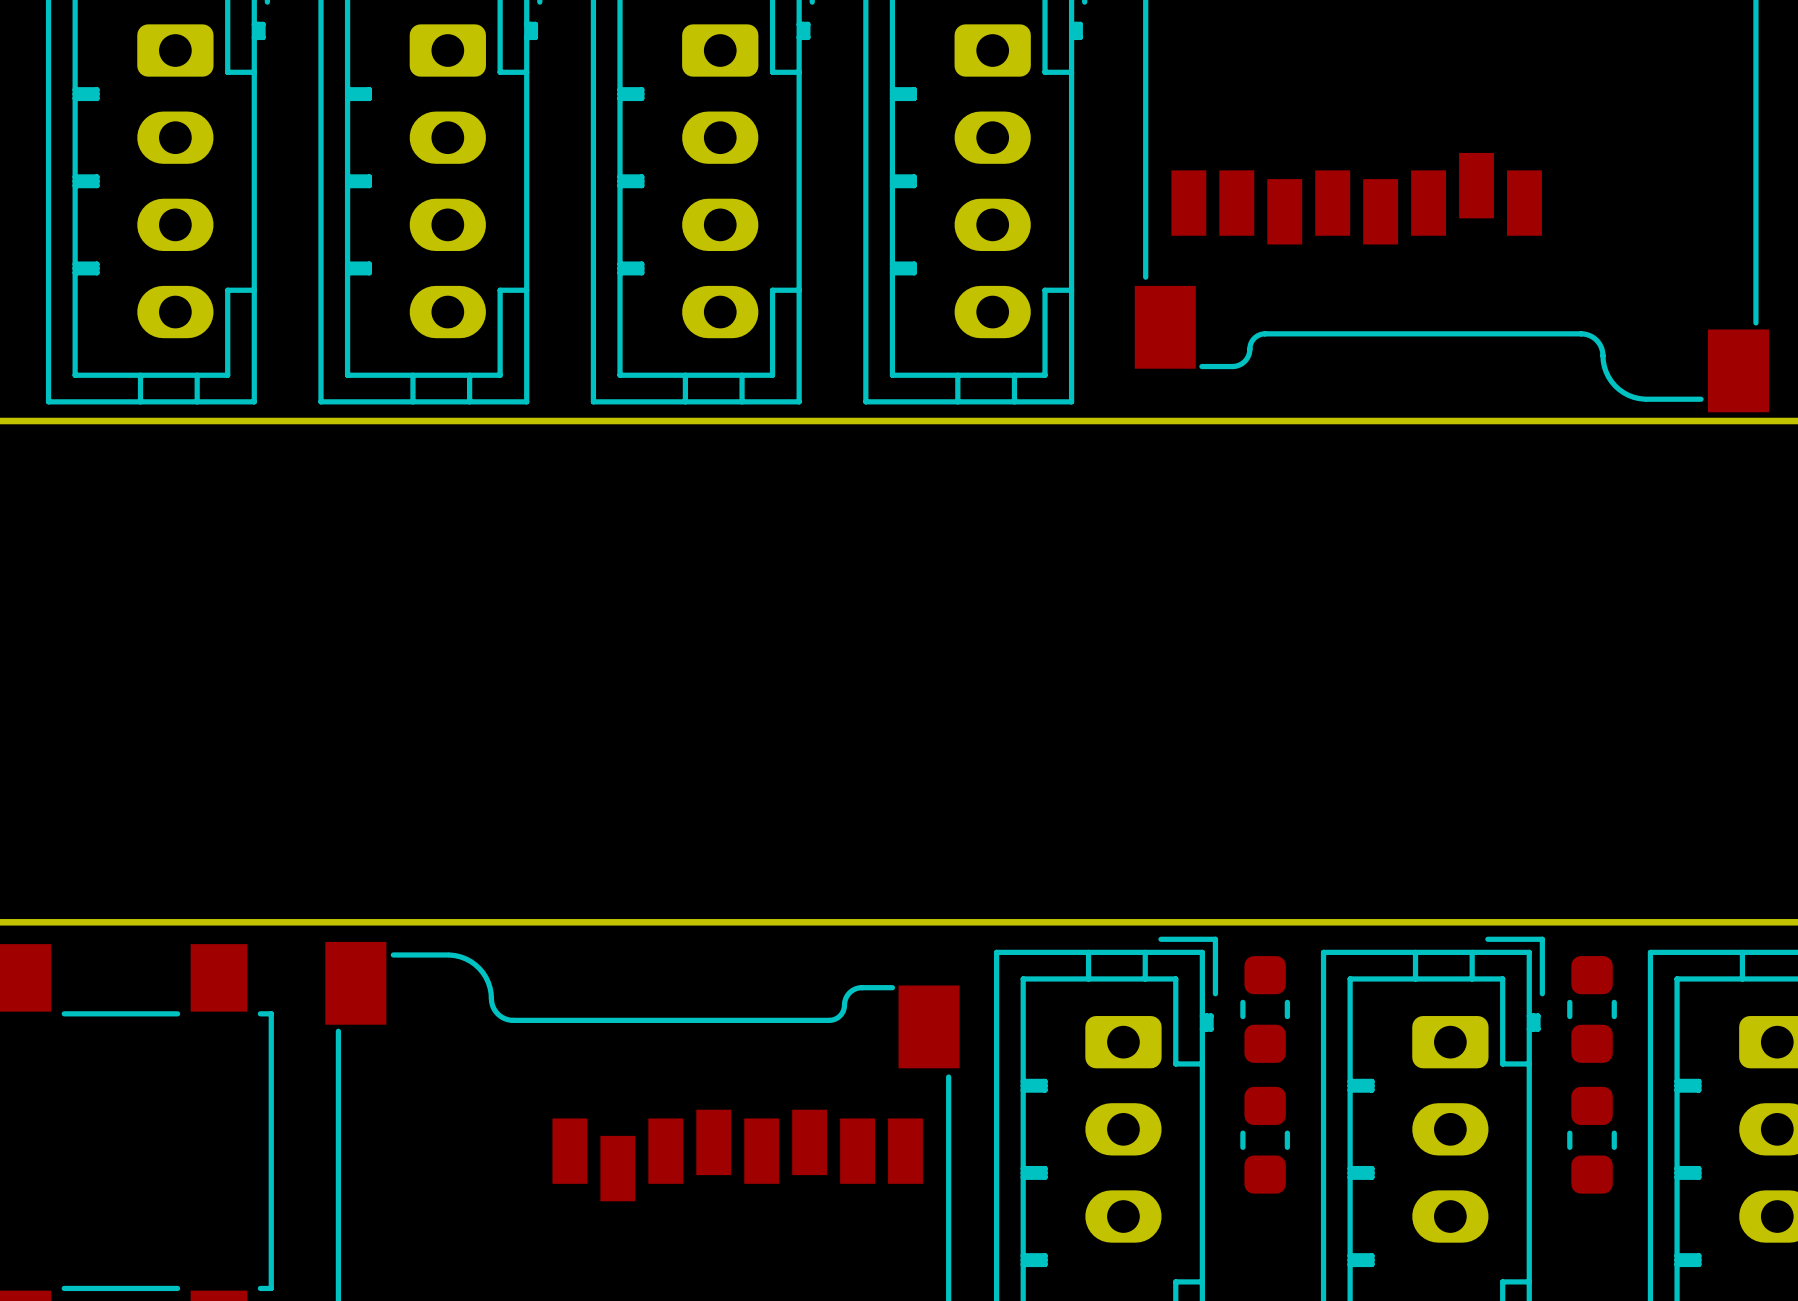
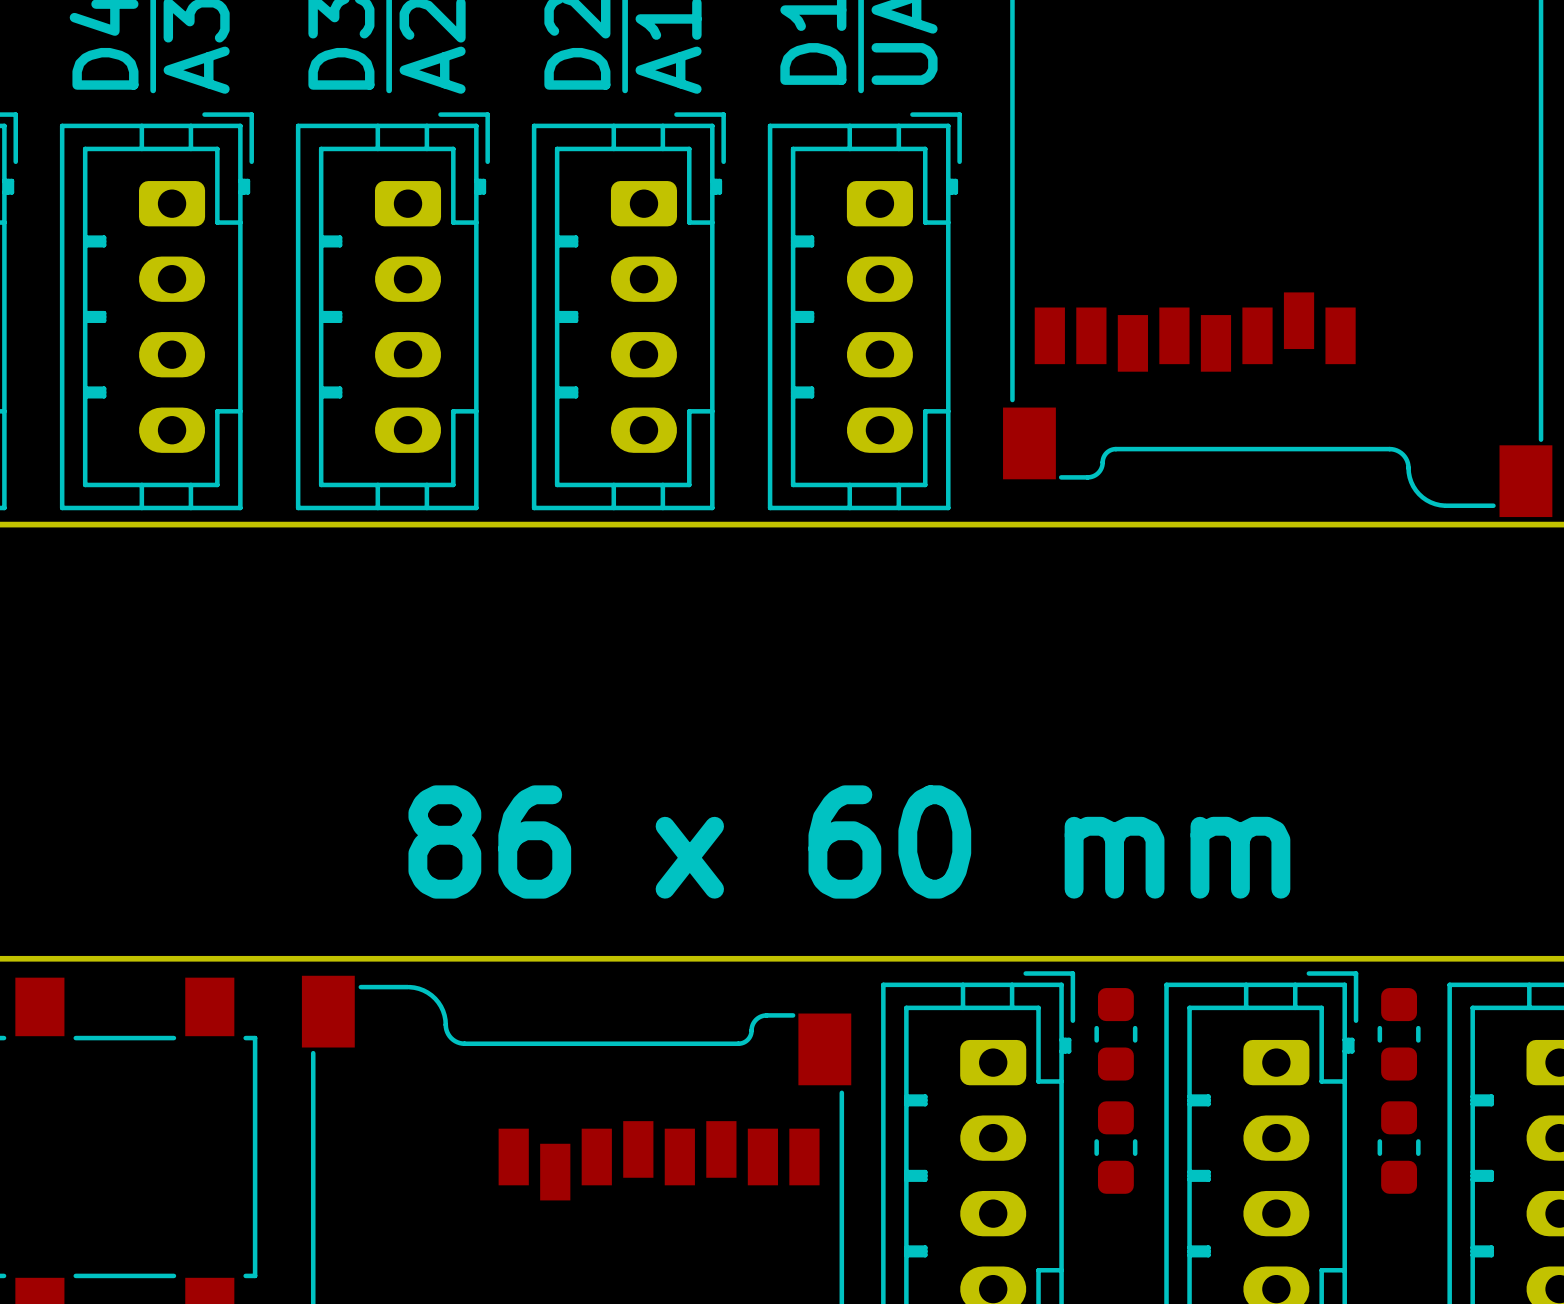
text: none -> 86 x 60 mm (849, 841)

